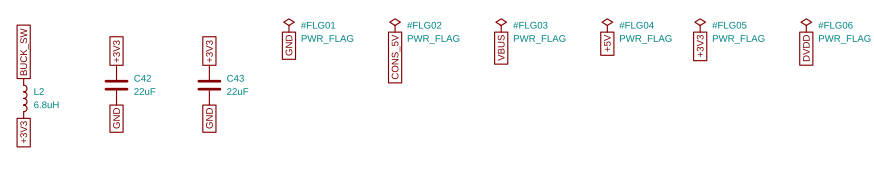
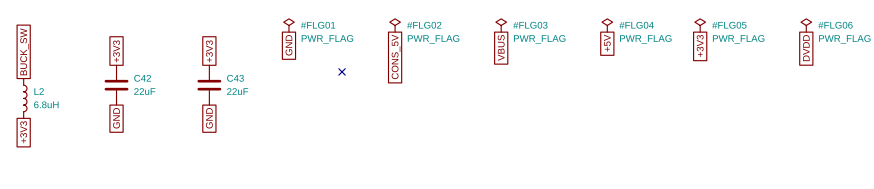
no-connect mark: none -> (342, 71)

